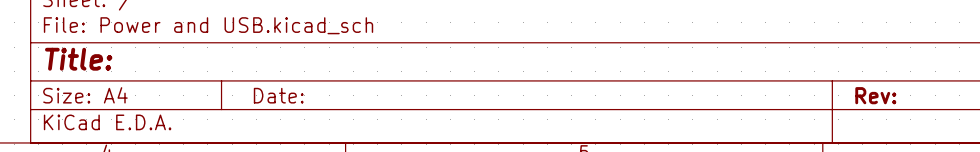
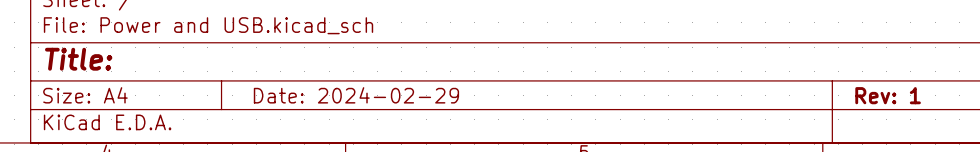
title block: Date: (278, 95) -> Date: 2024-02-29 (356, 95)
title block: Rev: (875, 95) -> Rev: 1 (888, 95)

